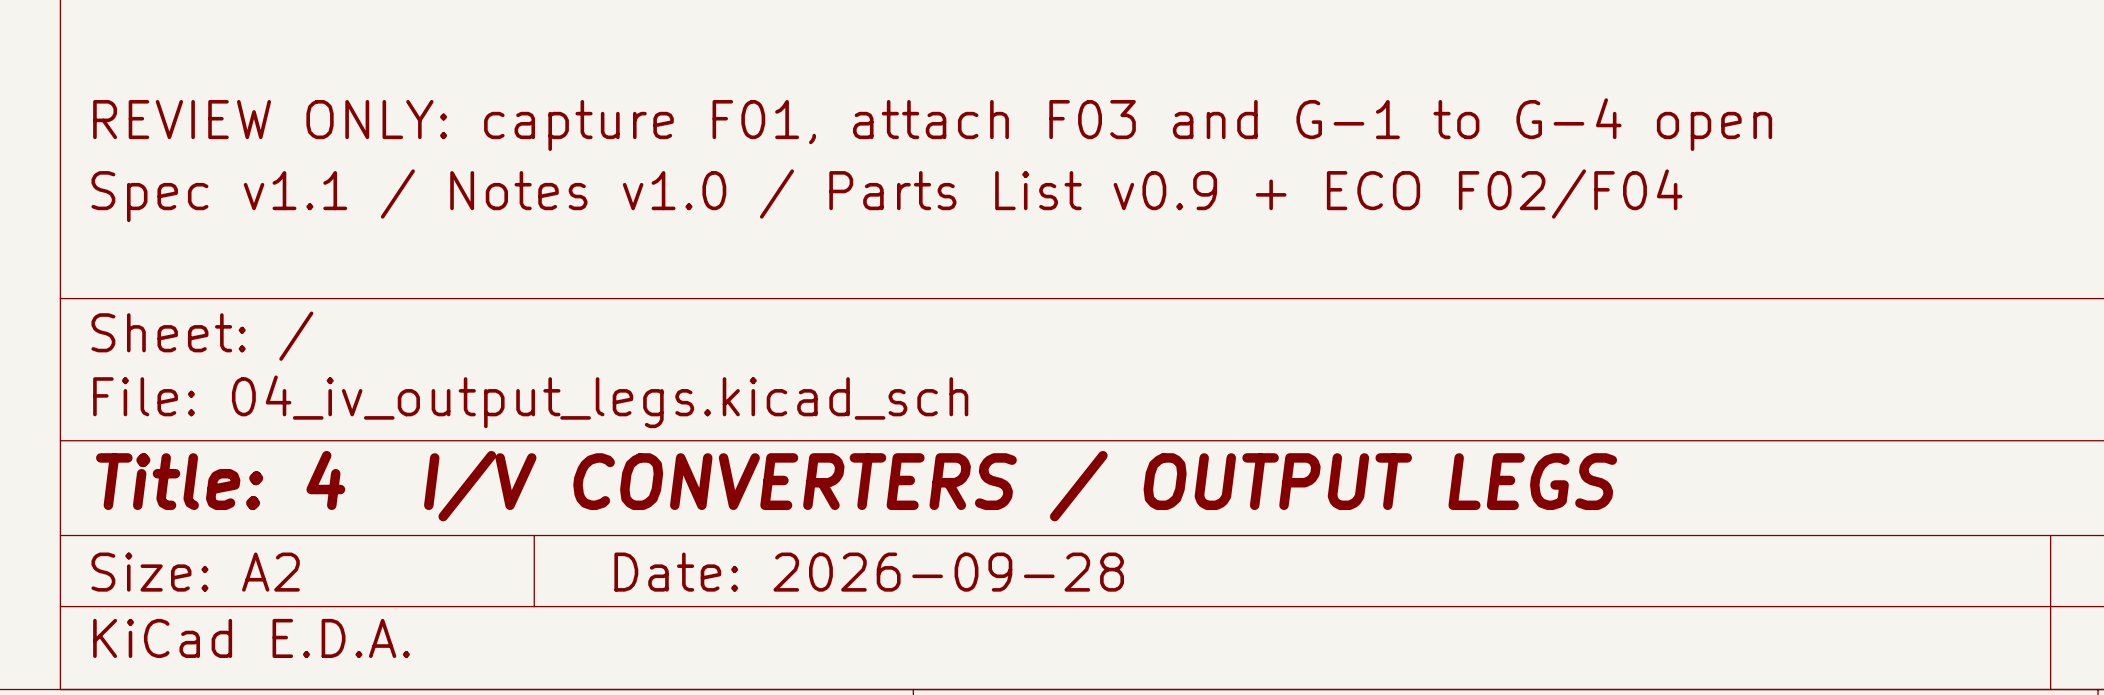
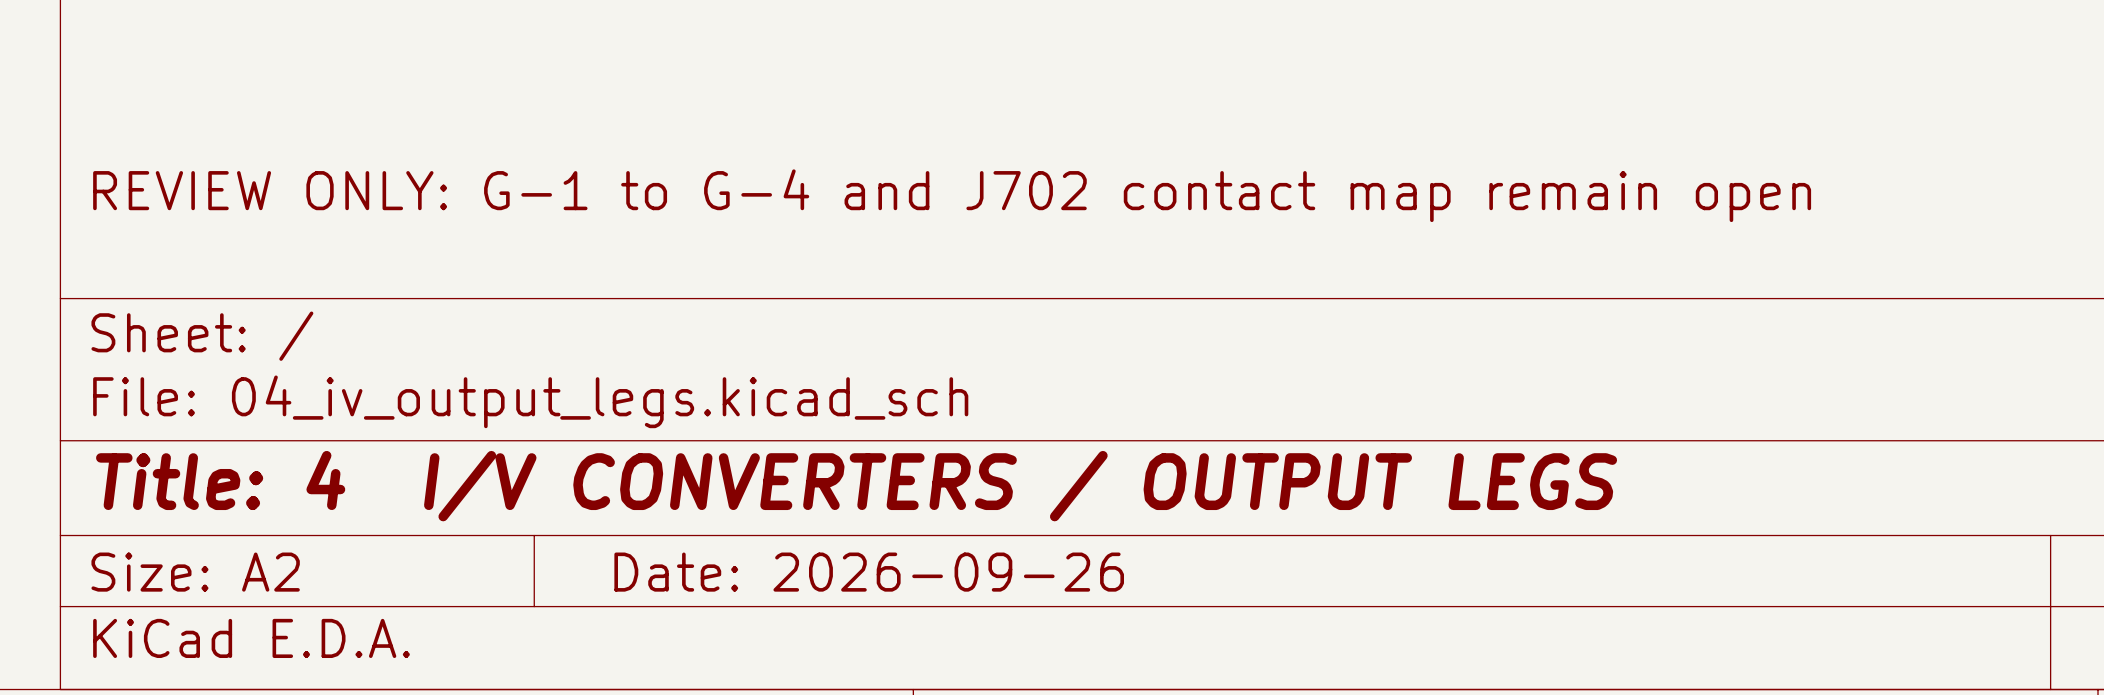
title block: REVIEW ONLY: capture F01, attach F03 and G-1 to G-4 open (932, 124) -> none
title block: Spec v1.1 / Notes v1.0 / Parts List v0.9 + ECO F02/F04 (886, 195) -> REVIEW ONLY: G-1 to G-4 and J702 contact map remain open (952, 195)
title block: Date: 2026-09-28 (869, 572) -> Date: 2026-09-26 (869, 572)

